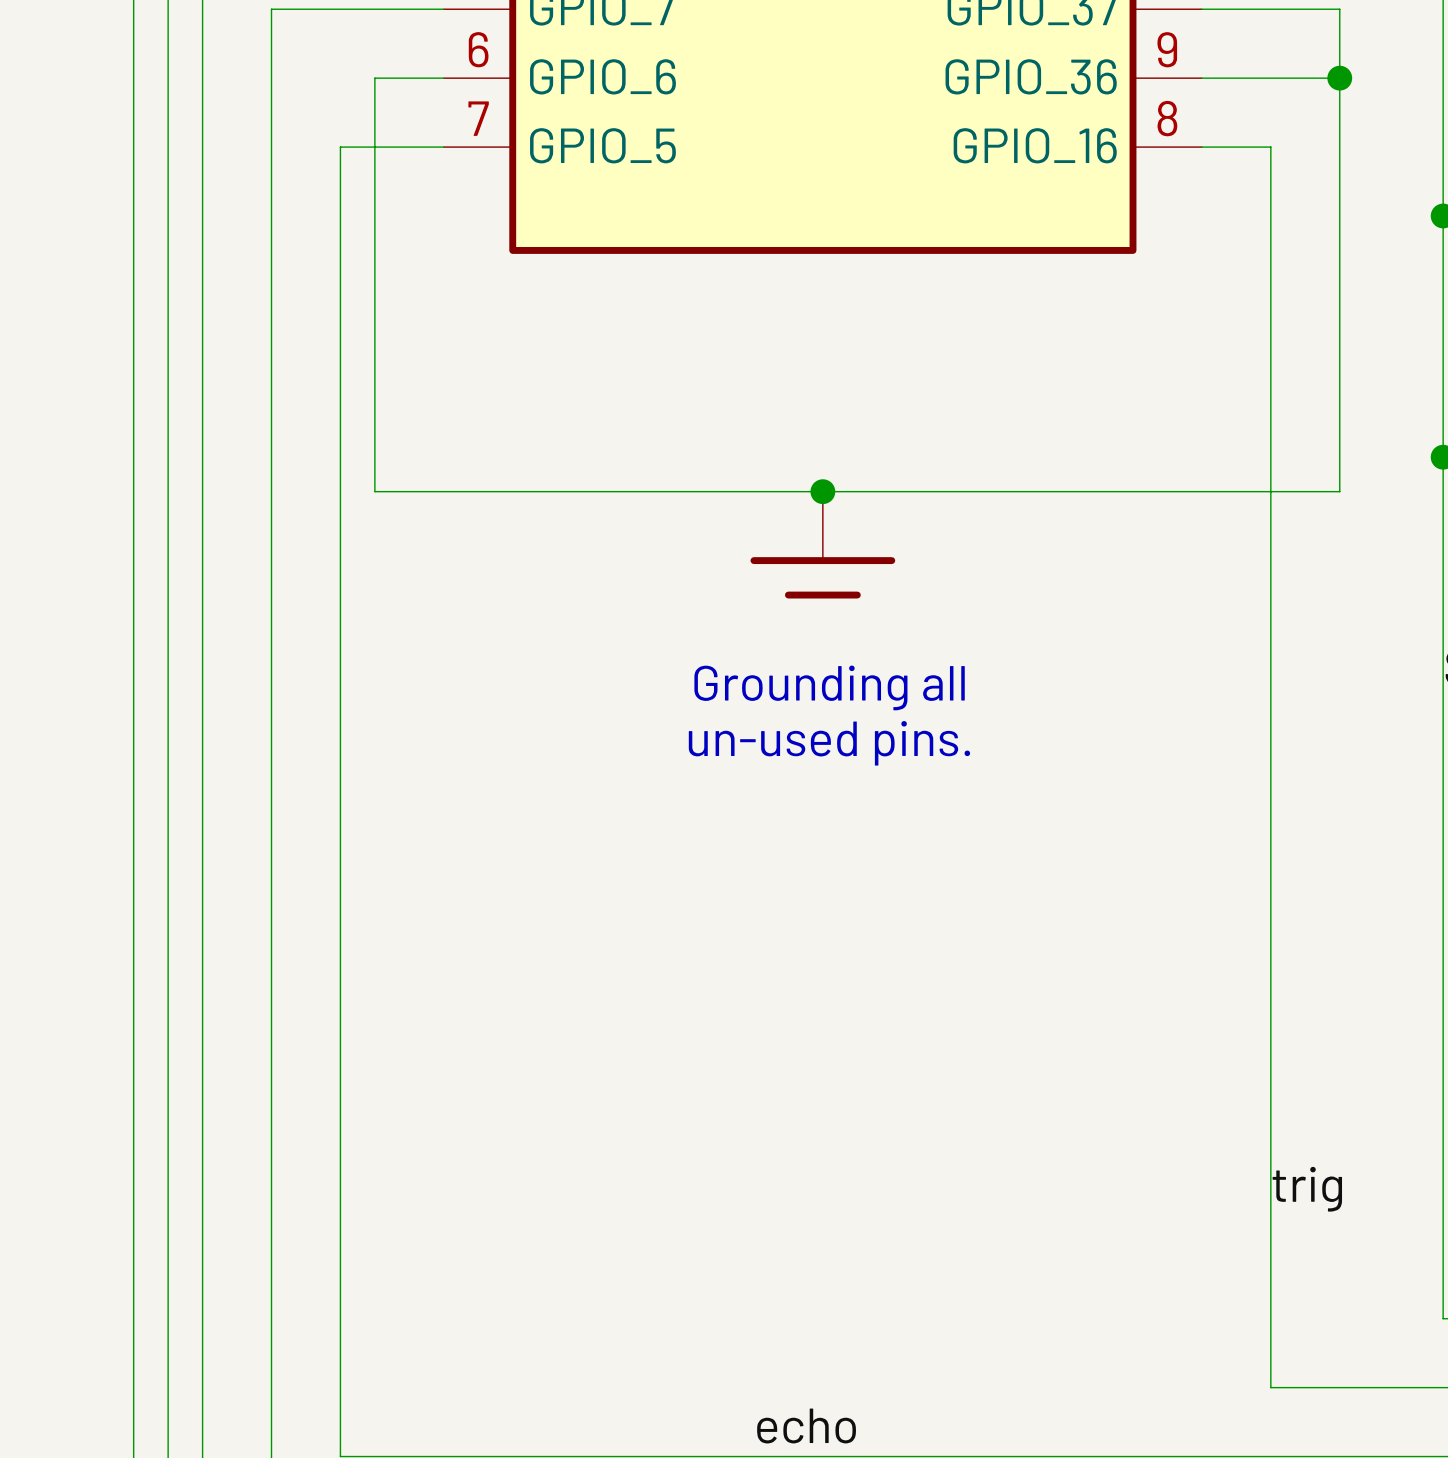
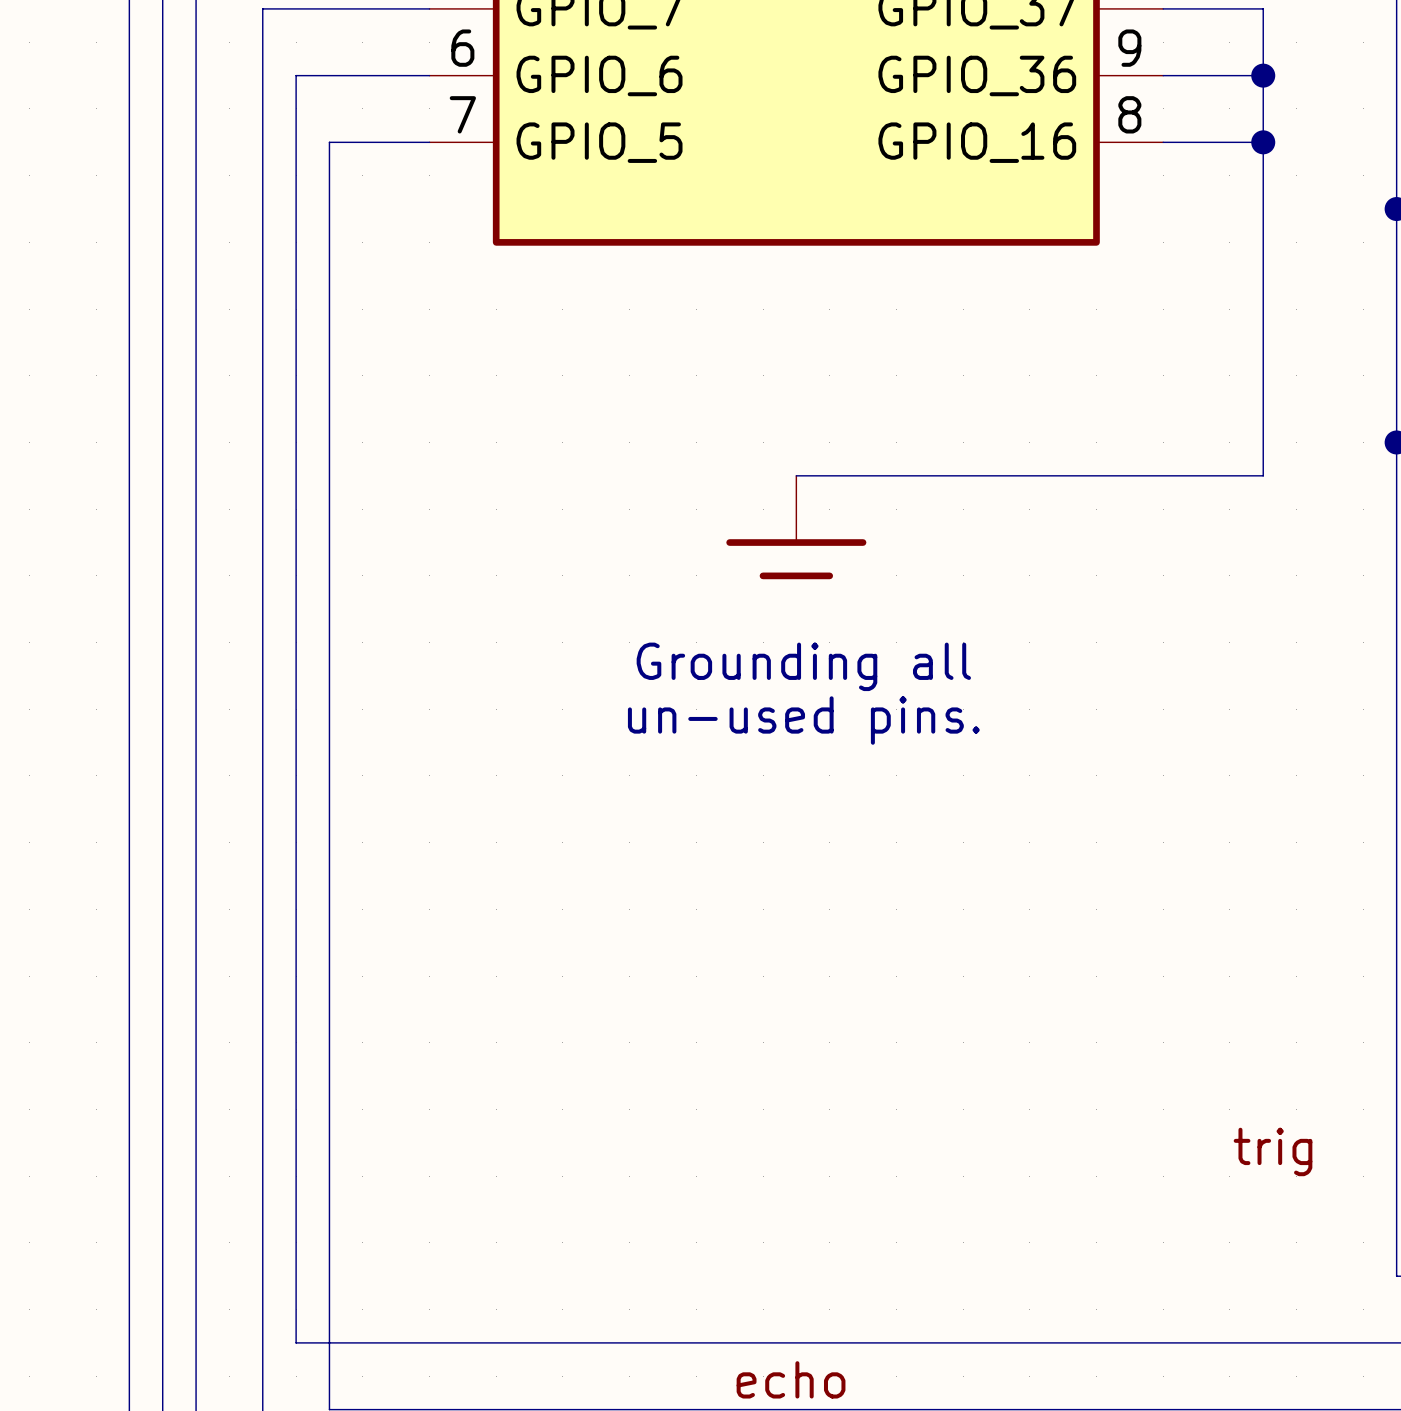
wire: (1305, 9) (1339, 9) (1339, 491) (1305, 491) -> (1263, 8) (1263, 475)
wire: (374, 78) (374, 491) (822, 491) -> none
wire: (1305, 78) (1339, 78) -> (1229, 142) (1263, 142)
junction position: (1339, 78) -> (1263, 75)
wire: (1270, 147) (1270, 1387) -> (362, 75) (296, 75) (296, 1342) (1229, 1342)
junction: none -> (1263, 142)
junction: (822, 491) -> none

